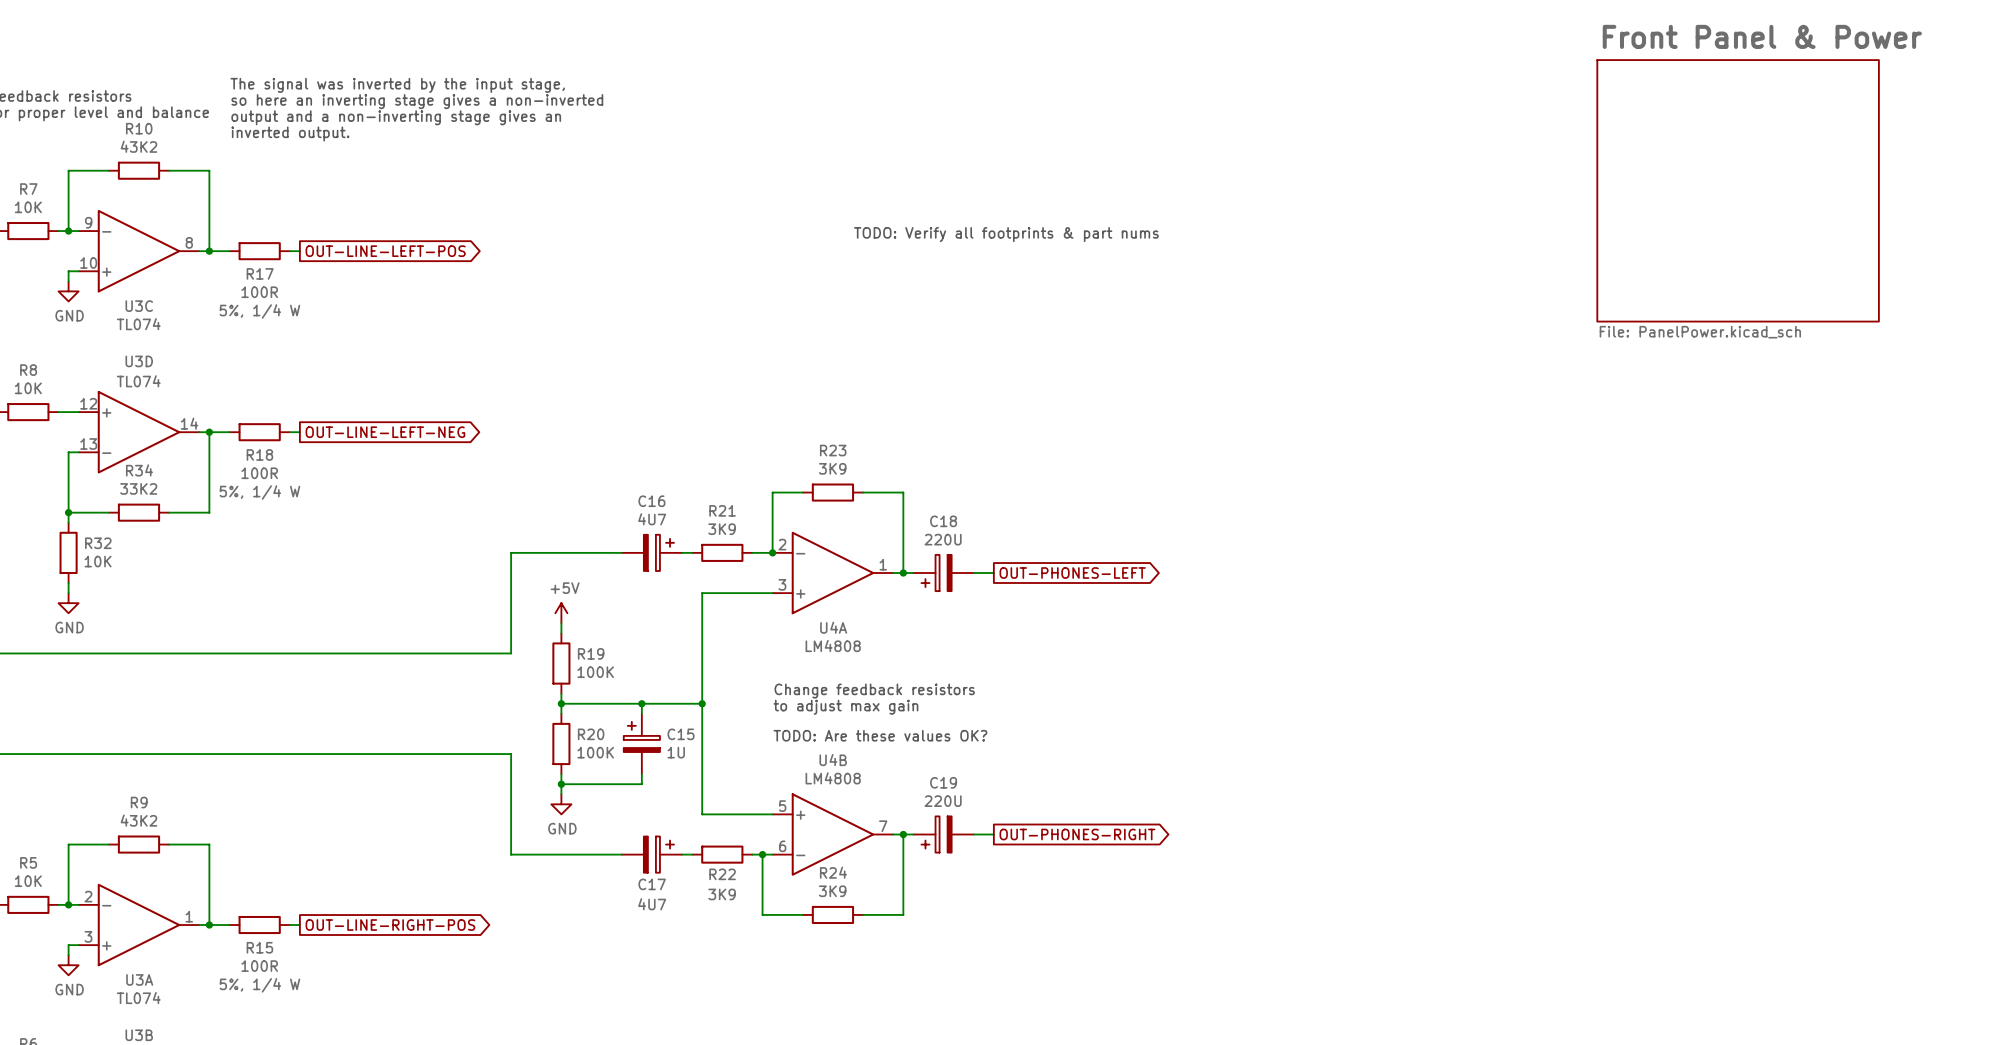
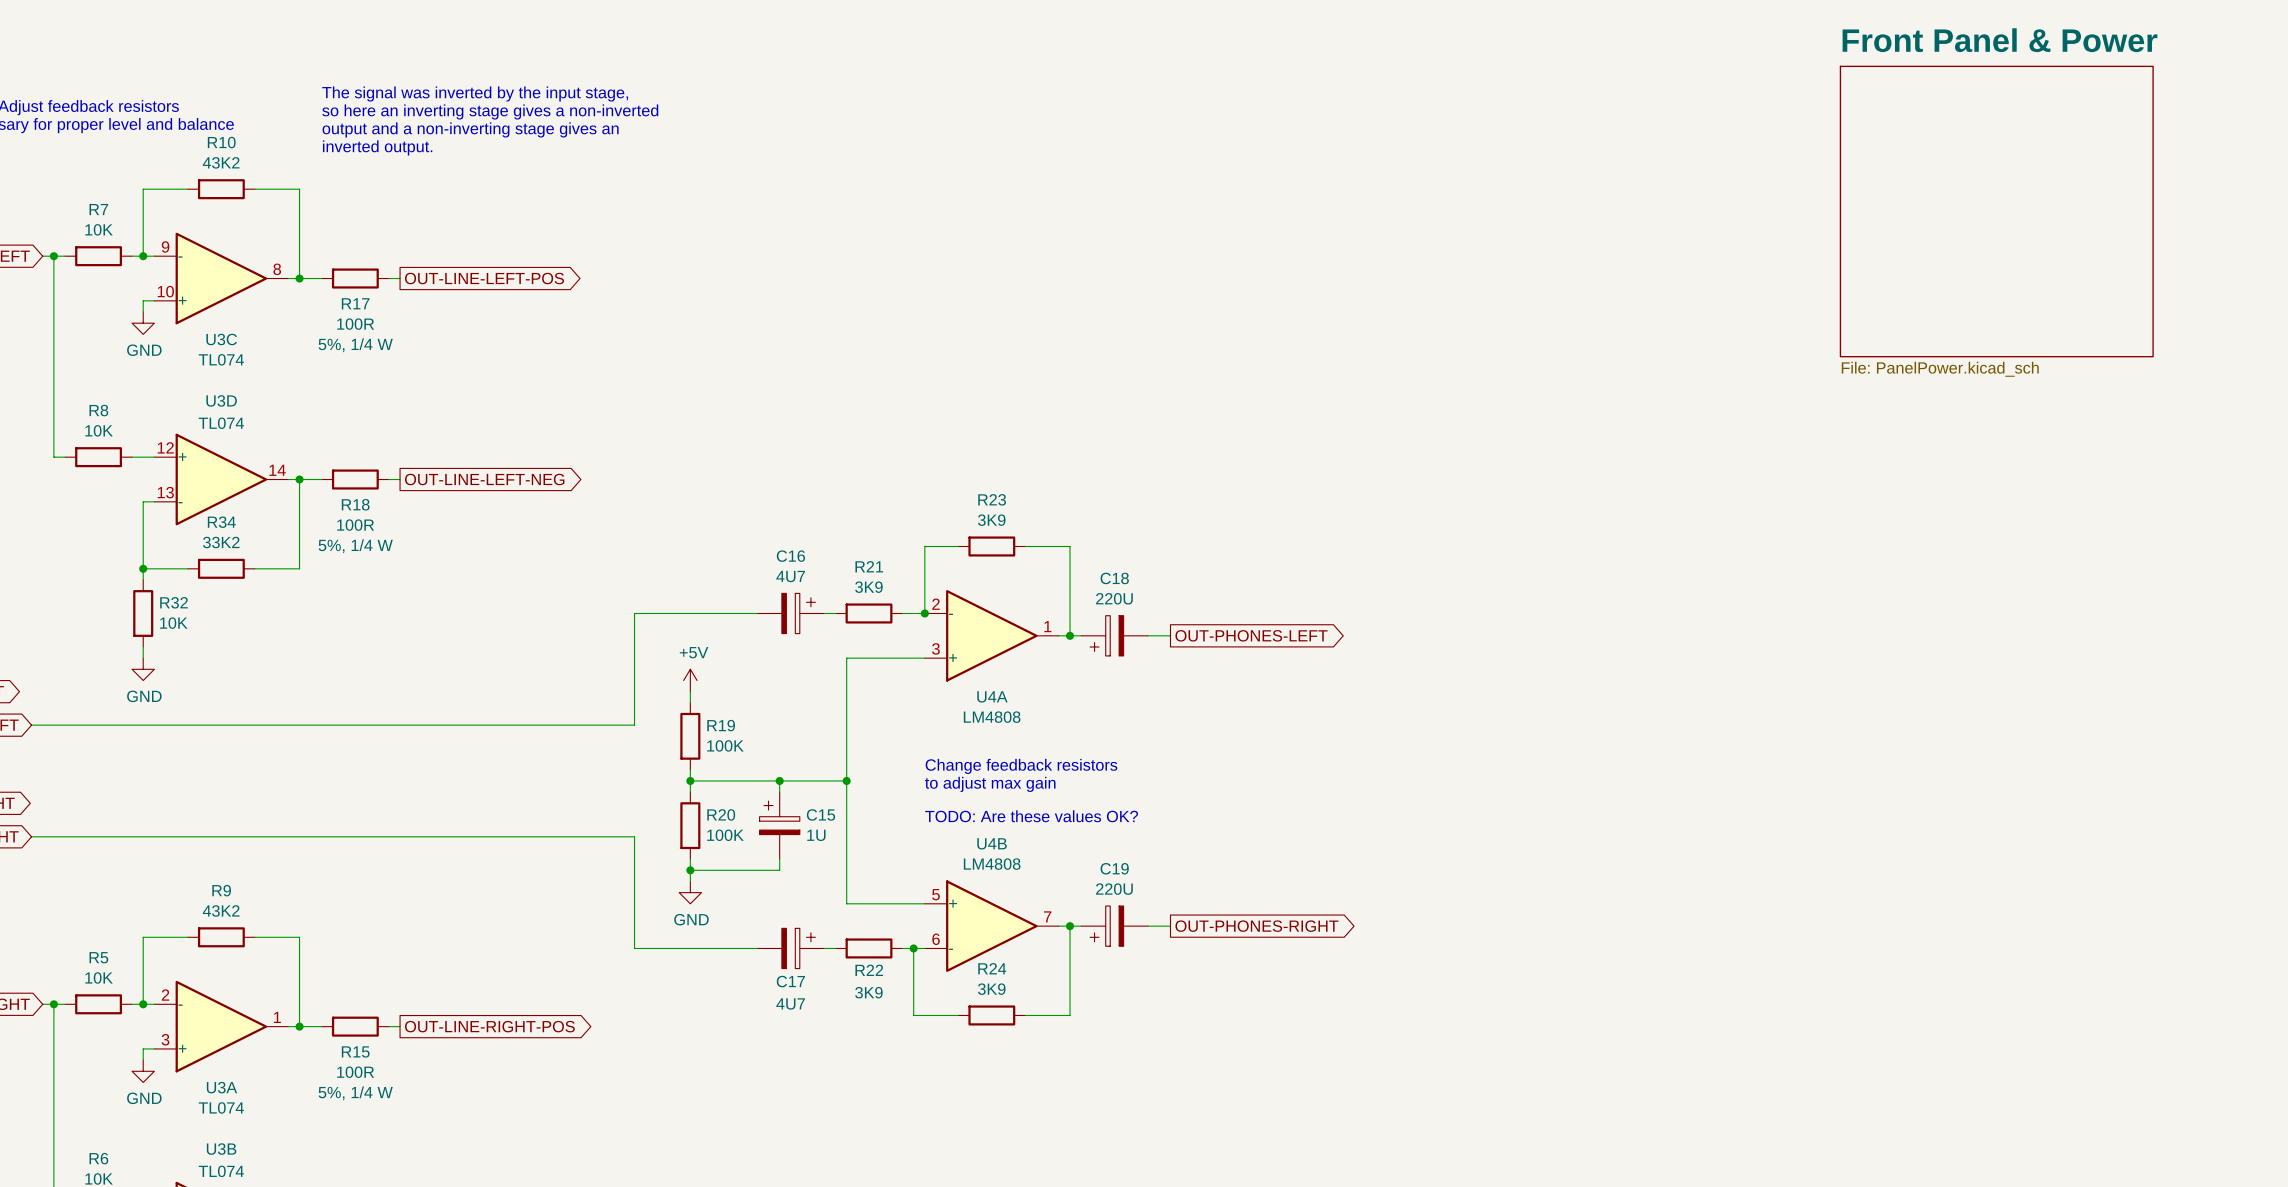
text: TODO: Verify all footprints & part nums (1006, 234) -> none

